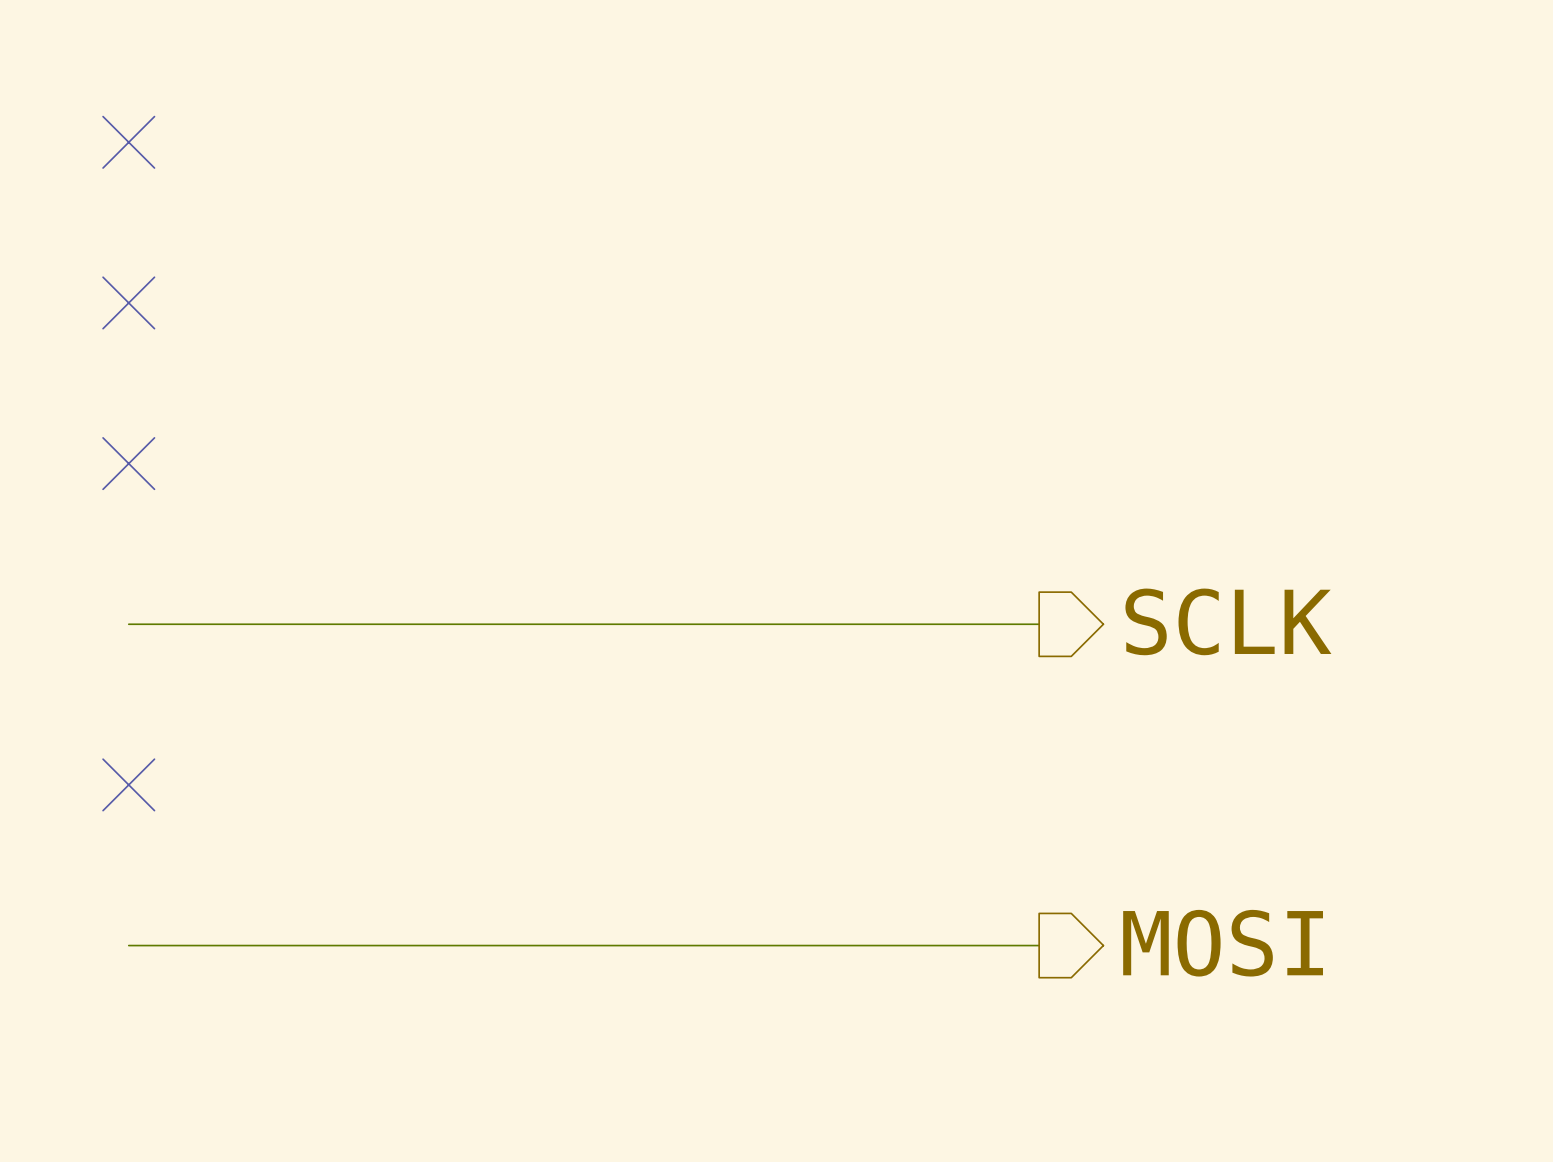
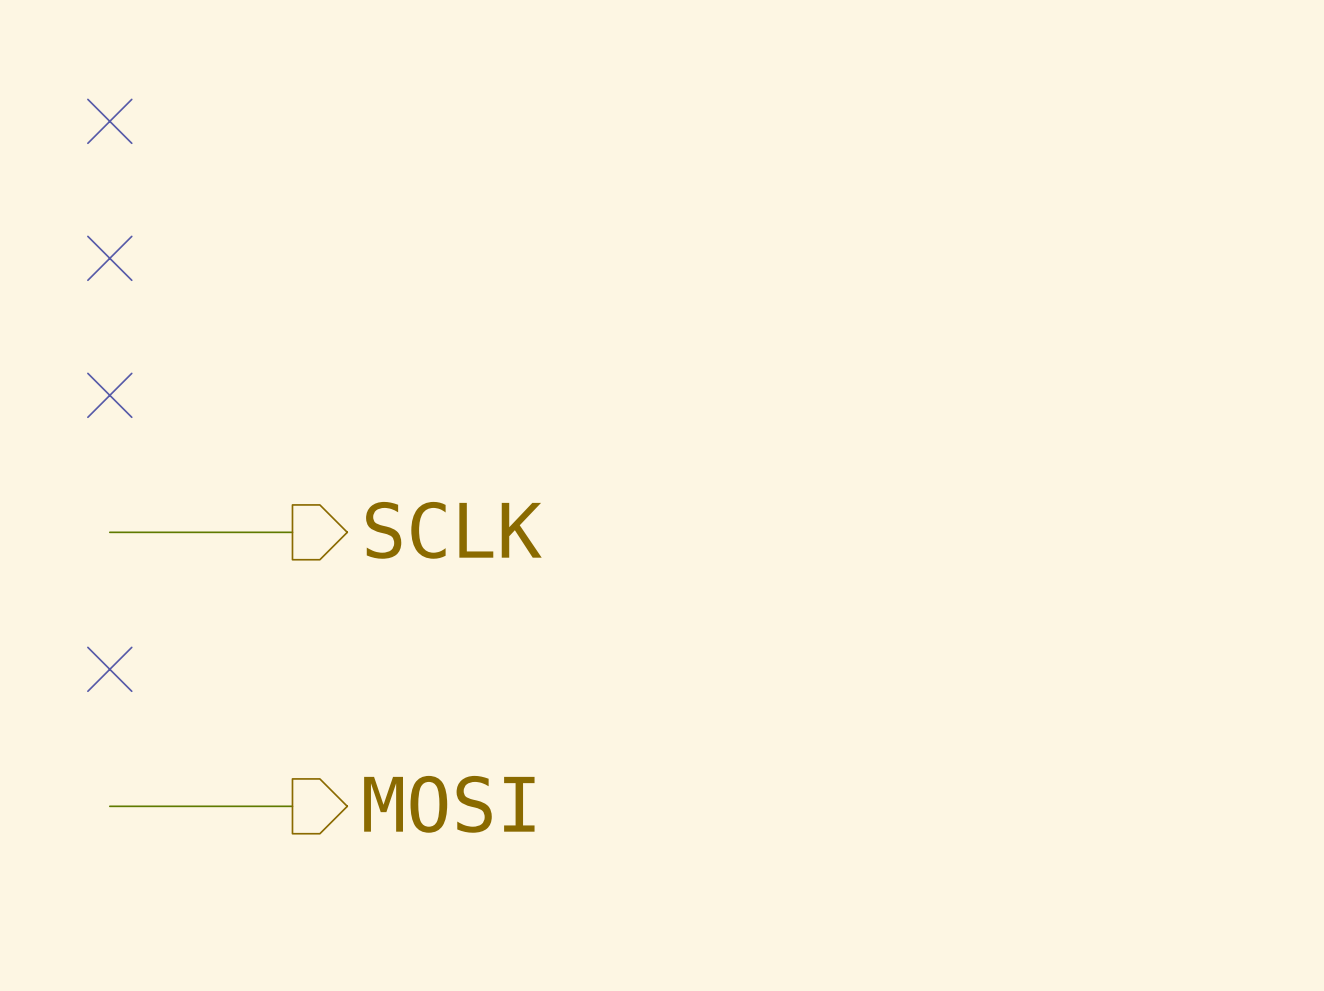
hierarchical label position: SCLK (1228, 621) -> SCLK (453, 530)
wire: (342, 624) (1039, 624) -> none
hierarchical label position: MOSI (1223, 943) -> MOSI (449, 804)
wire: (342, 945) (1039, 945) -> none

